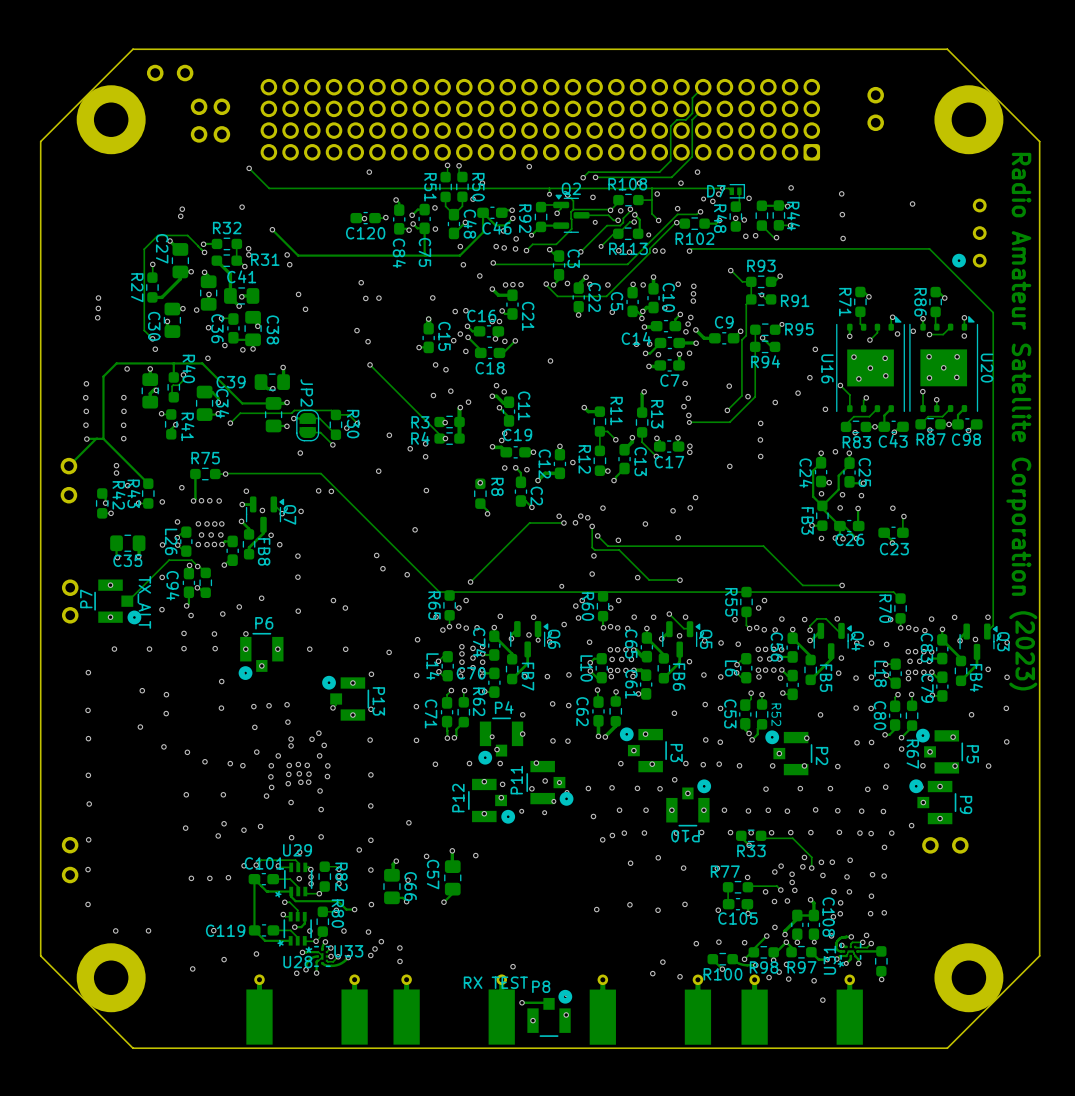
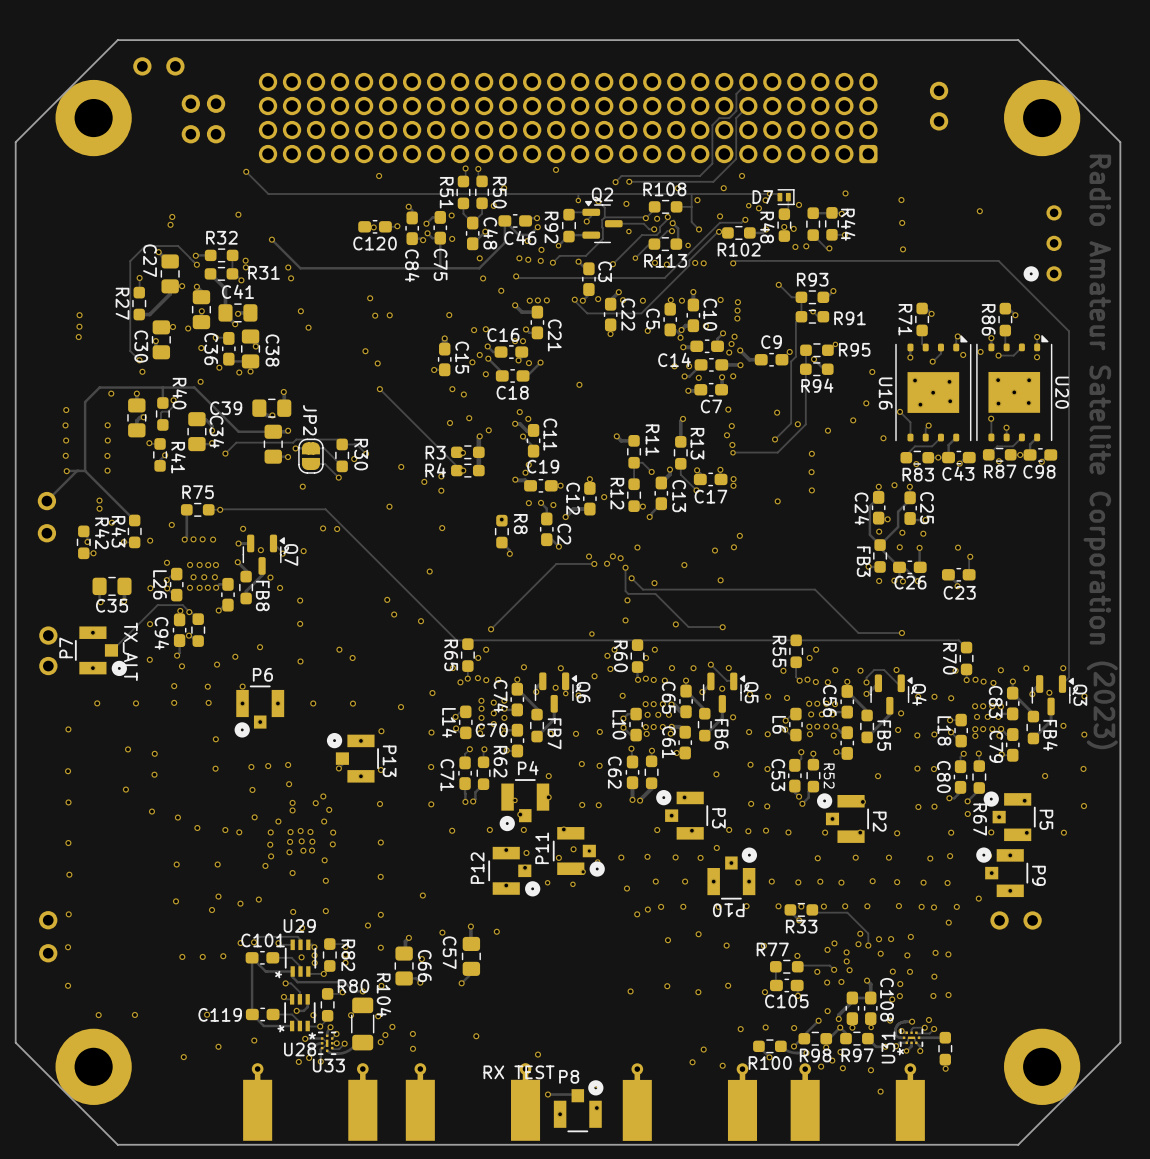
R80 name rotation: 0° (337, 913) -> 90° counterclockwise (353, 986)
R104: none -> (362, 1023)
via: none -> (476, 1036)
U33 name position: U33 (348, 951) -> U33 (328, 1065)
via: (348, 957) -> none

